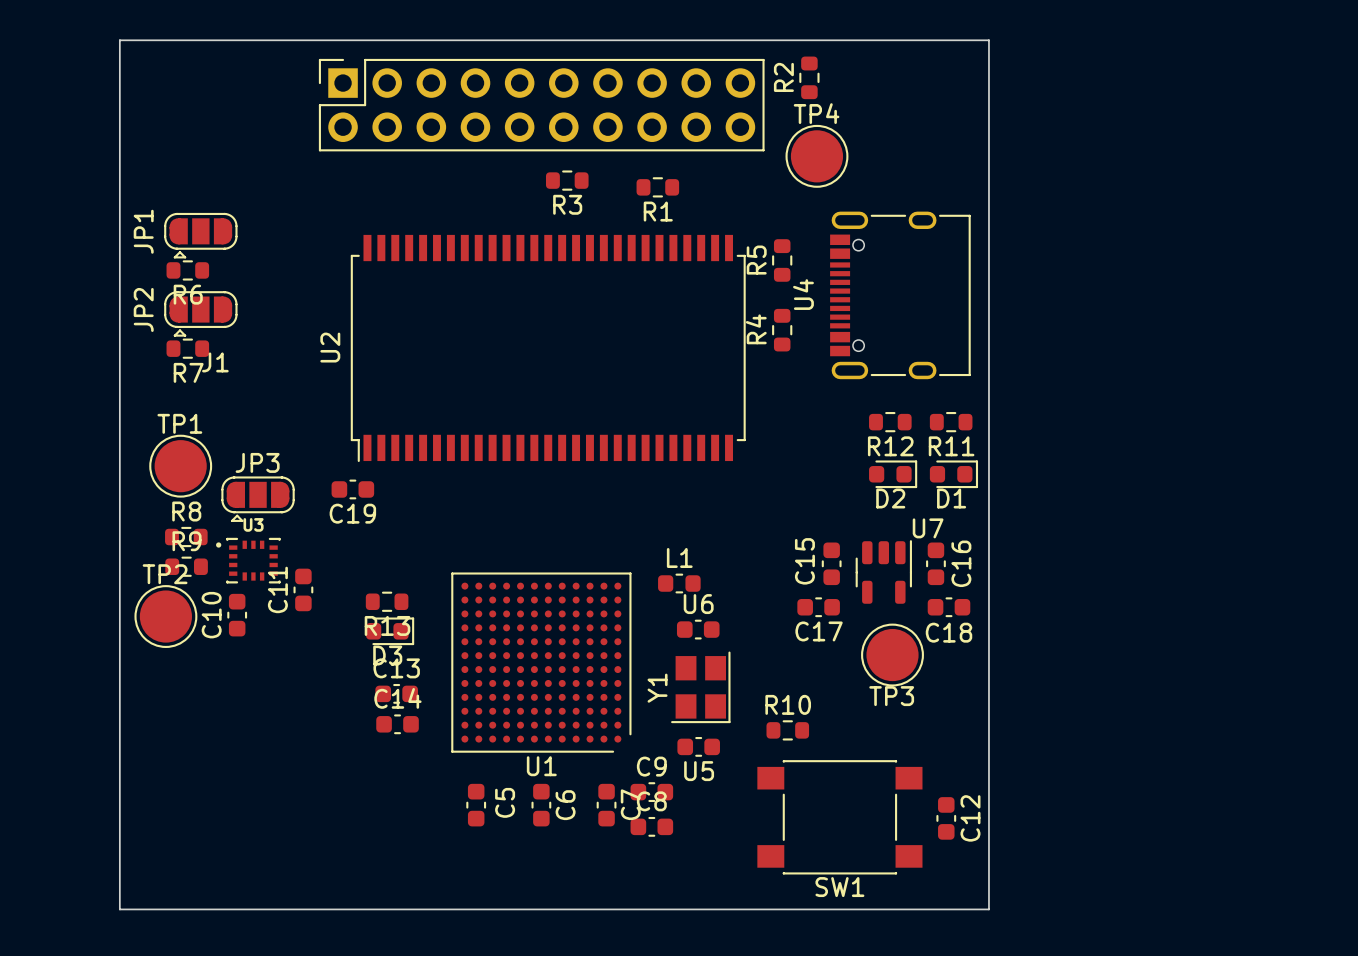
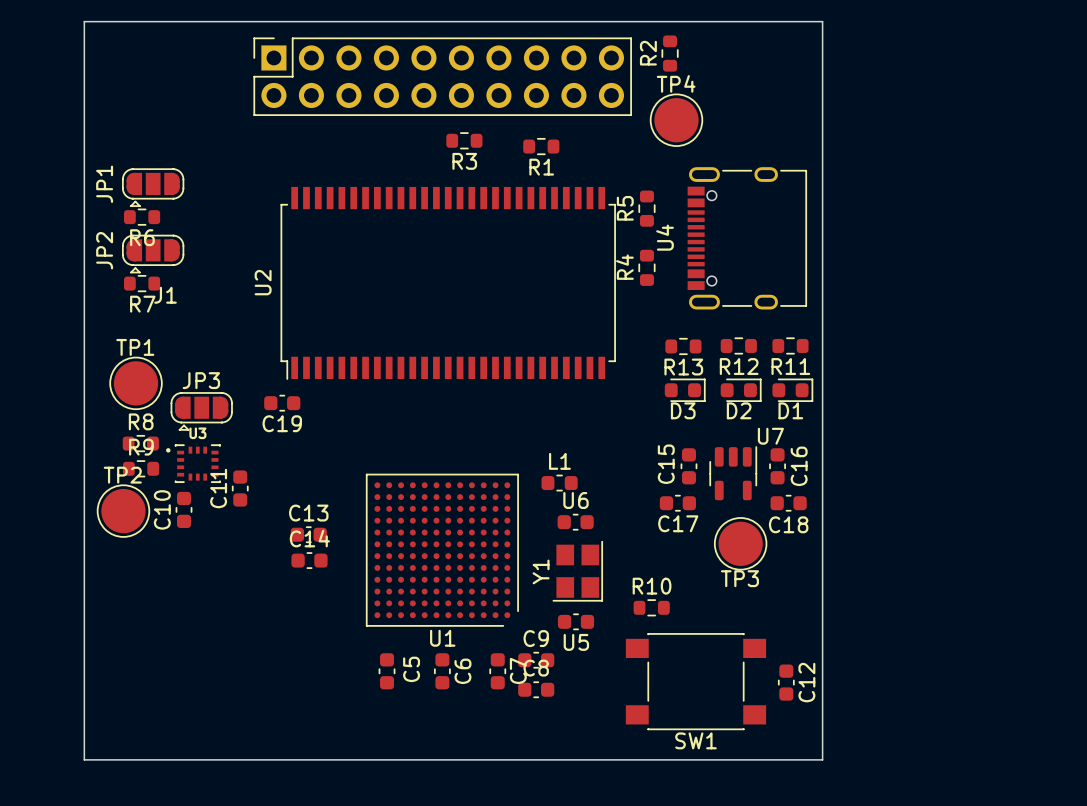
R13 position: (387, 601) -> (683, 346)
D3 position: (390, 631) -> (685, 390)
C13 position: (396, 693) -> (308, 534)
C14 position: (397, 724) -> (309, 560)

